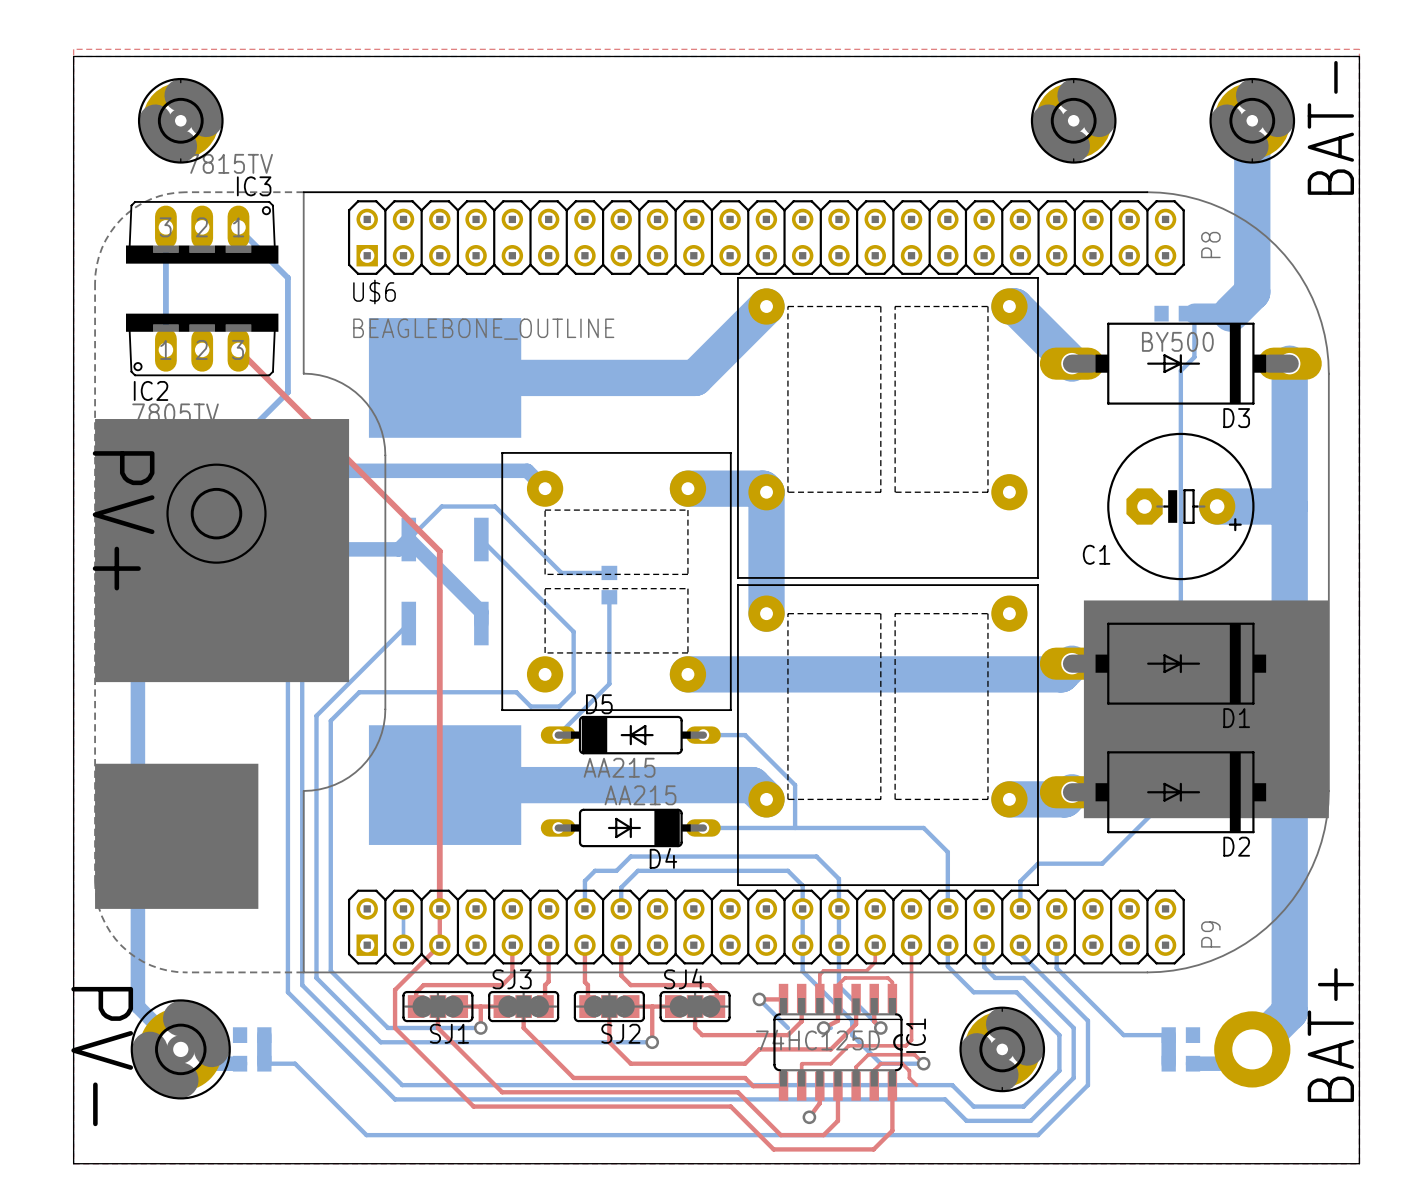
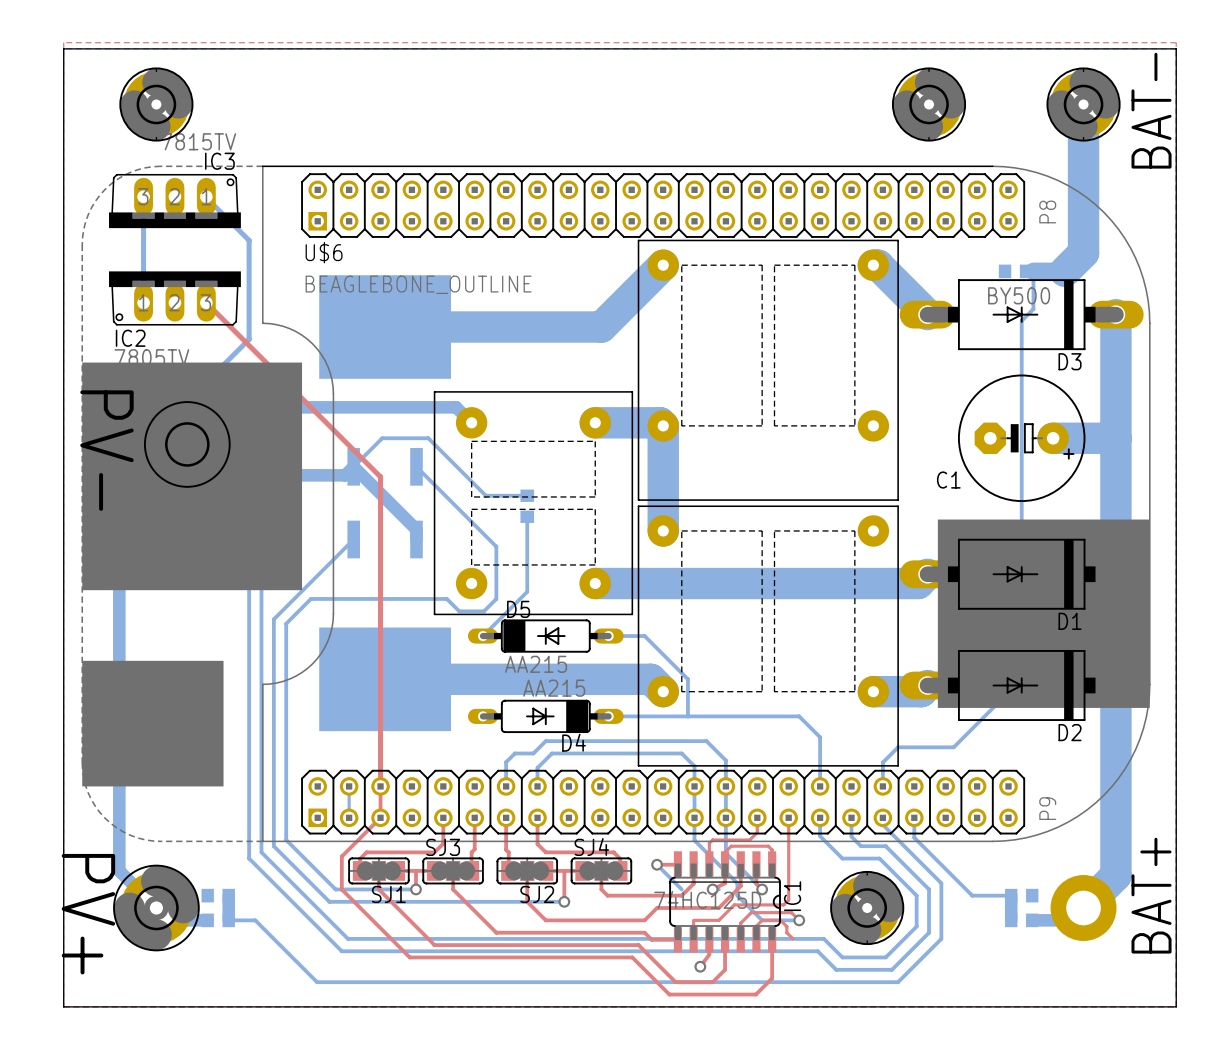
text: PV+ (123, 520) -> PV- (106, 450)
text: PV- (102, 1056) -> PV+ (88, 914)

